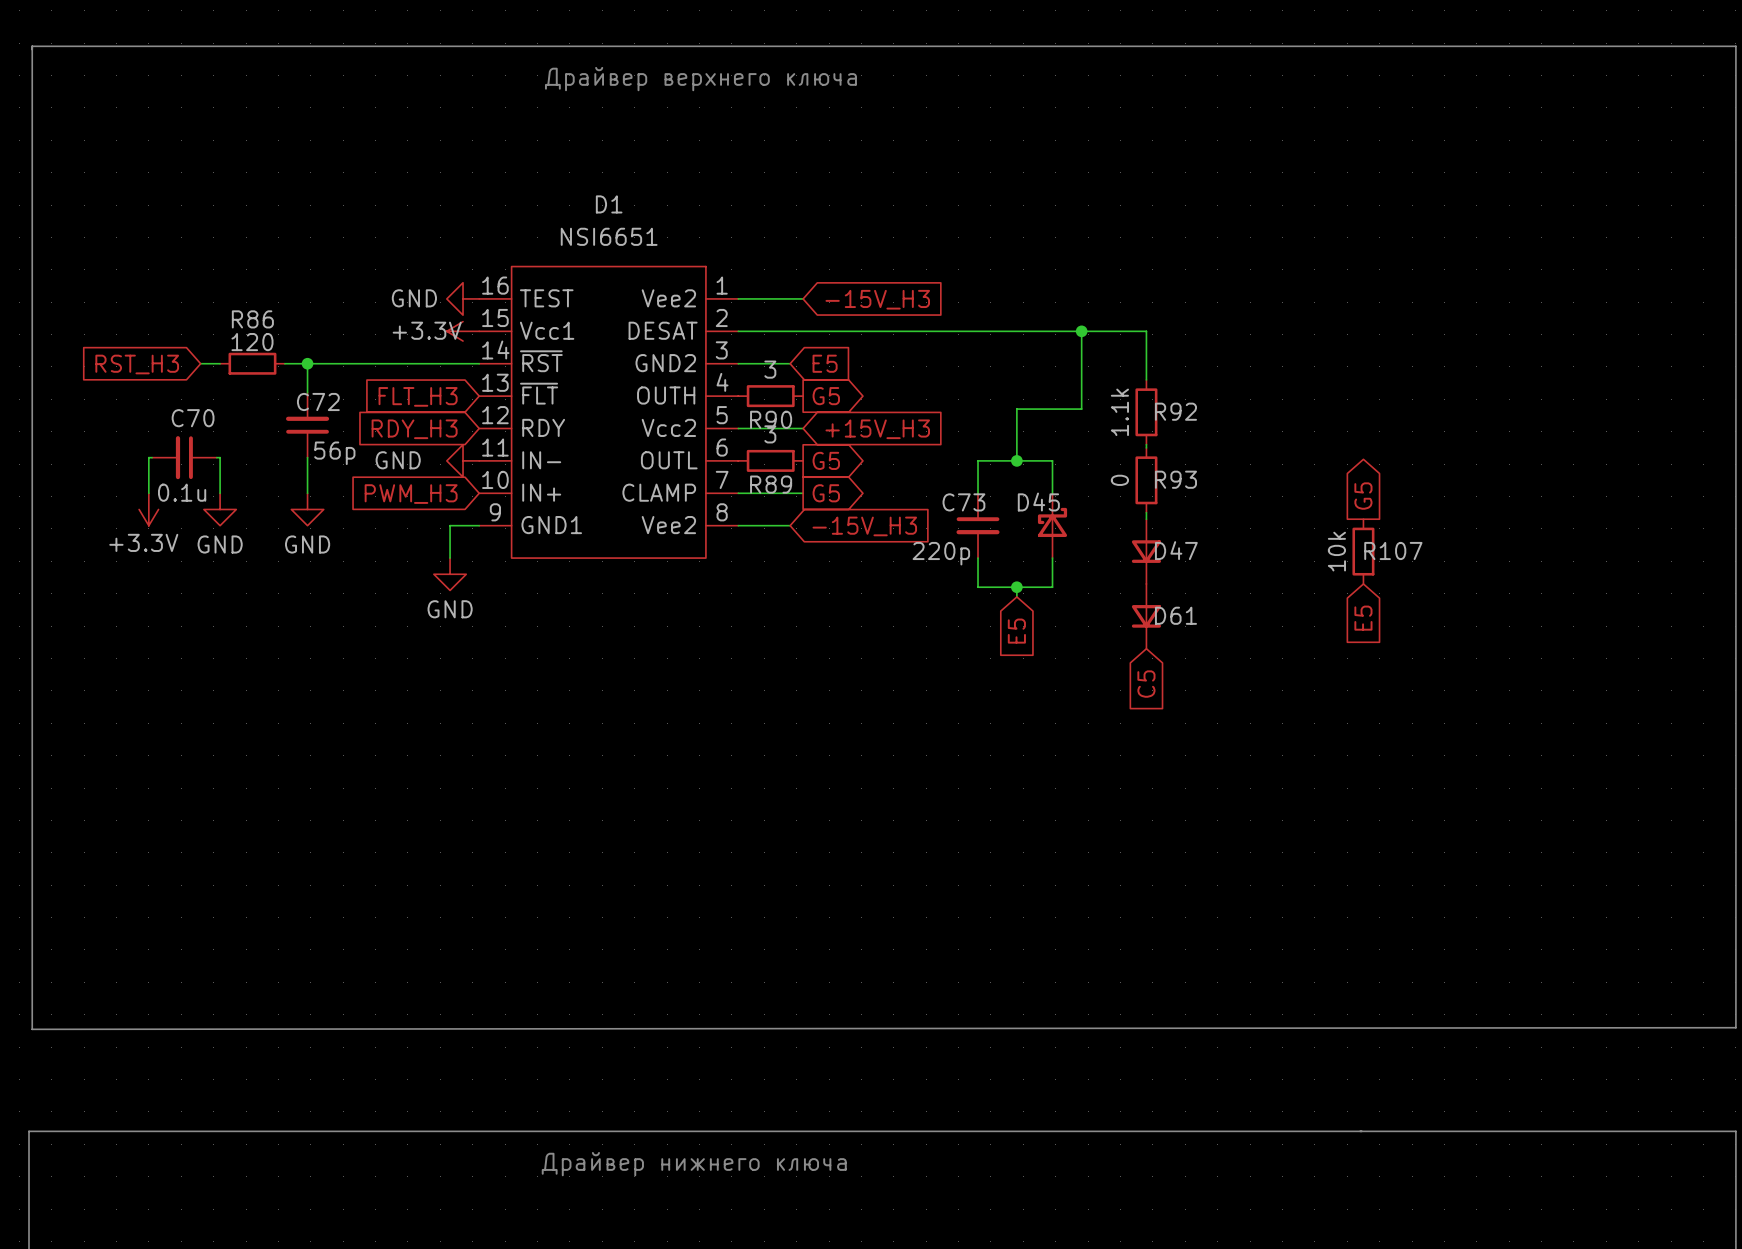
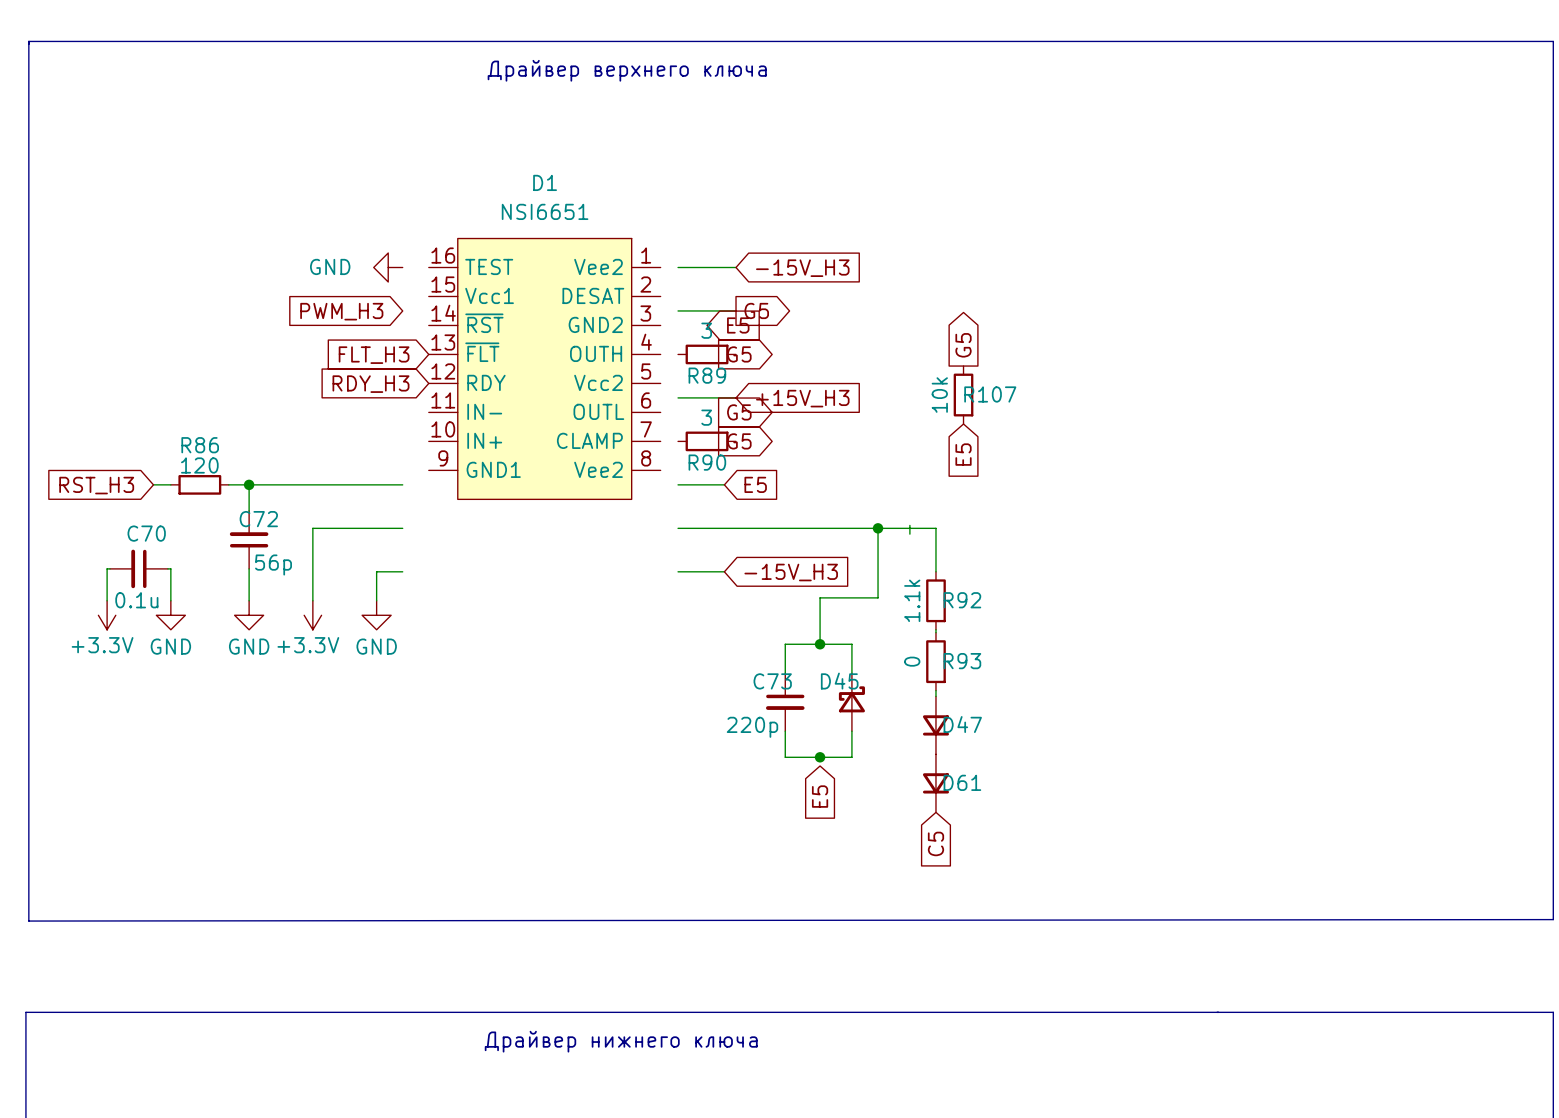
power symbol text position: GND (414, 298) -> GND (330, 266)
power symbol position: GND (463, 298) -> GND (388, 267)
wire: (738, 298) (757, 298) -> (718, 267) (736, 267)
global label position: -15V_H3 (877, 299) -> -15V_H3 (802, 268)
power symbol: +3.3V (463, 331) -> none
wire: (738, 331) (1146, 331) (1146, 379) -> none
wire: (1081, 331) (1081, 409) (1016, 409) (1016, 460) -> (878, 528) (878, 597) (820, 597) (820, 644)
junction: (1081, 331) -> none
global label: none -> G5 (756, 310)
wire: (200, 363) (220, 363) -> (153, 484) (170, 484)
R86 position: (252, 363) -> (199, 484)
wire: (284, 363) (479, 363) -> (228, 484) (402, 484)
wire: (307, 363) (307, 392) -> (249, 484) (249, 510)
junction: (307, 363) -> none
wire: (738, 363) (790, 363) -> (678, 571) (724, 571)
global label position: RST_H3 (137, 364) -> RST_H3 (96, 485)
global label: none -> G5 (963, 345)
R90 position: (770, 396) -> (707, 441)
R92 position: (1146, 412) -> (935, 600)
C72 position: (307, 425) -> (249, 539)
wire: (738, 428) (803, 428) -> (678, 397) (736, 397)
global label position: +15V_H3 (877, 429) -> +15V_H3 (802, 398)
wire: (1146, 444) (1146, 447) -> (935, 629) (935, 632)
wire: (152, 457) (148, 457) (148, 493) -> (109, 568) (107, 568) (107, 600)
C70 position: (184, 457) -> (138, 568)
wire: (216, 457) (220, 457) (220, 493) -> (167, 568) (170, 568) (170, 600)
wire: (307, 457) (307, 493) -> (249, 568) (249, 600)
power symbol: GND (463, 460) -> none
R89 position: (770, 460) -> (707, 354)
junction: (1016, 460) -> none
R93 position: (1146, 480) -> (935, 661)
wire: (738, 493) (803, 493) -> (678, 310) (736, 310)
wire: (978, 493) (978, 460) (1052, 460) (1052, 493) -> (785, 673) (785, 644) (851, 644) (851, 673)
global label position: PWM_H3 (411, 494) -> PWM_H3 (341, 311)
global label: G5 (1363, 496) -> none
global label: none -> E5 (963, 454)
power symbol: +3.3V (148, 509) -> none
power symbol: GND (220, 509) -> none
power symbol: GND (307, 509) -> none
wire: (1146, 512) (1146, 519) -> (935, 690) (935, 696)
wire: (479, 525) (450, 525) (450, 558) -> (402, 571) (376, 571) (376, 600)
wire: (738, 525) (790, 525) -> (678, 484) (724, 484)
C73 position: (978, 525) -> (785, 702)
D45 position: (1052, 525) -> (851, 702)
global label: -15V_H3 (864, 526) -> none
junction: none -> (249, 484)
global label: none -> E5 (755, 484)
D47 position: (1146, 551) -> (935, 725)
R107 position: (1363, 551) -> (963, 395)
wire: (978, 558) (978, 587) (1052, 587) (1052, 558) -> (785, 731) (785, 757) (851, 757) (851, 731)
power symbol: GND (450, 574) -> none
junction position: (1016, 587) -> (878, 528)
wire: none -> (402, 528) (312, 528) (312, 600)
wire: none -> (678, 528) (935, 528) (935, 571)
D61 position: (1146, 616) -> (935, 783)
global label: E5 (1363, 618) -> none
global label: E5 (1016, 631) -> none
global label: none -> -15V_H3 (791, 572)
global label position: C5 (1146, 684) -> C5 (935, 843)
power symbol: none -> +3.3V (107, 615)
power symbol: none -> GND (170, 615)
power symbol: none -> GND (249, 615)
power symbol: none -> +3.3V (312, 615)
power symbol: none -> GND (376, 615)
junction: none -> (820, 644)
junction: none -> (820, 757)
global label: none -> E5 (820, 796)

